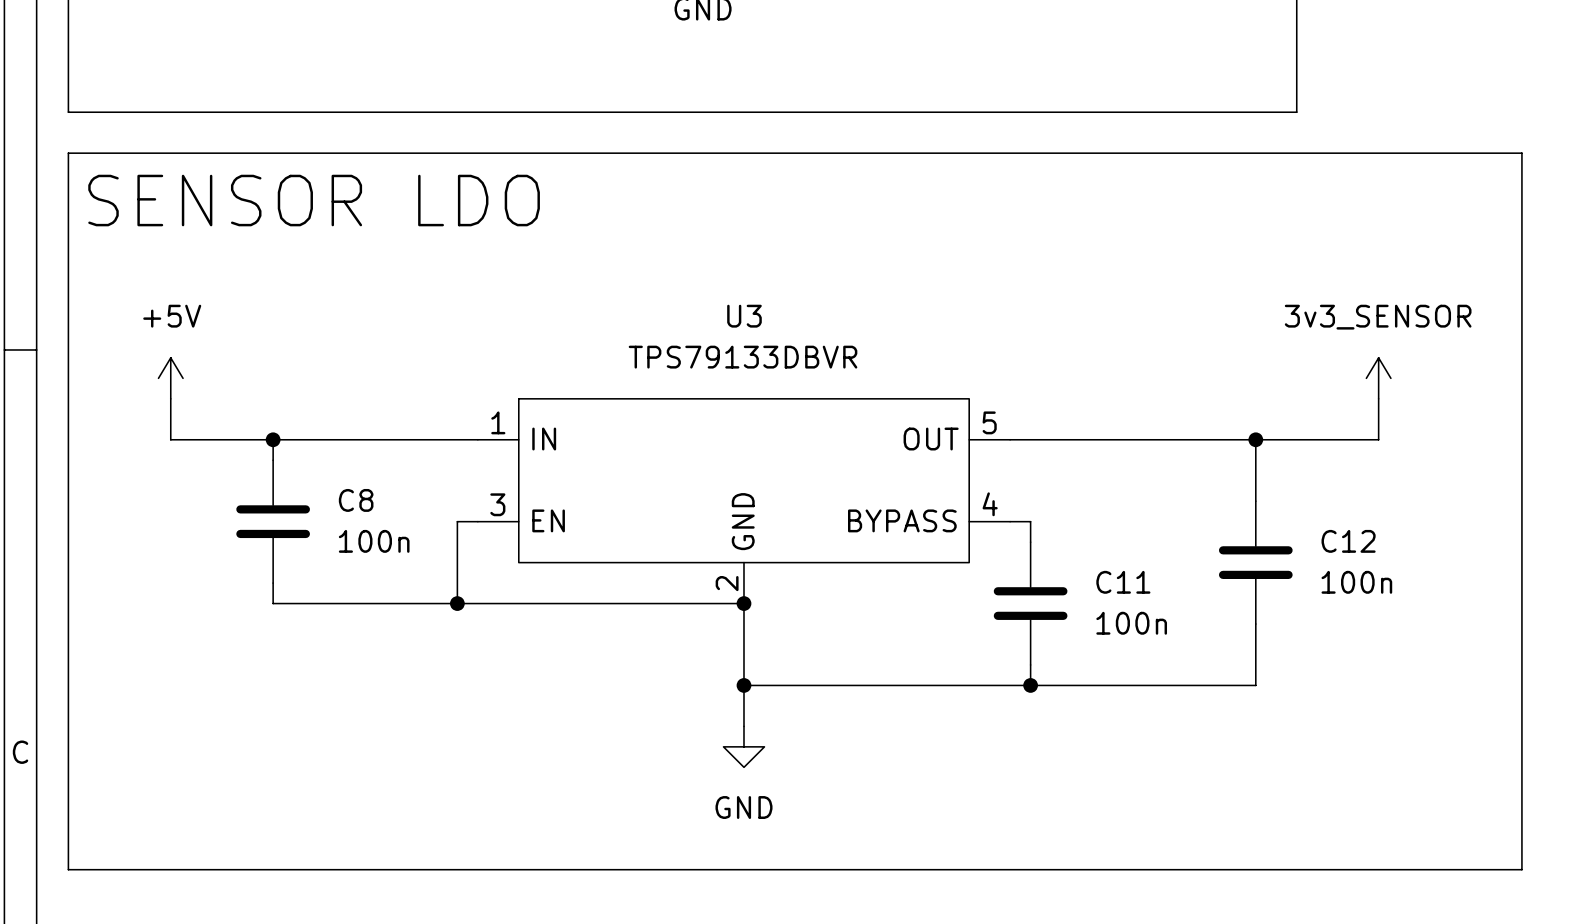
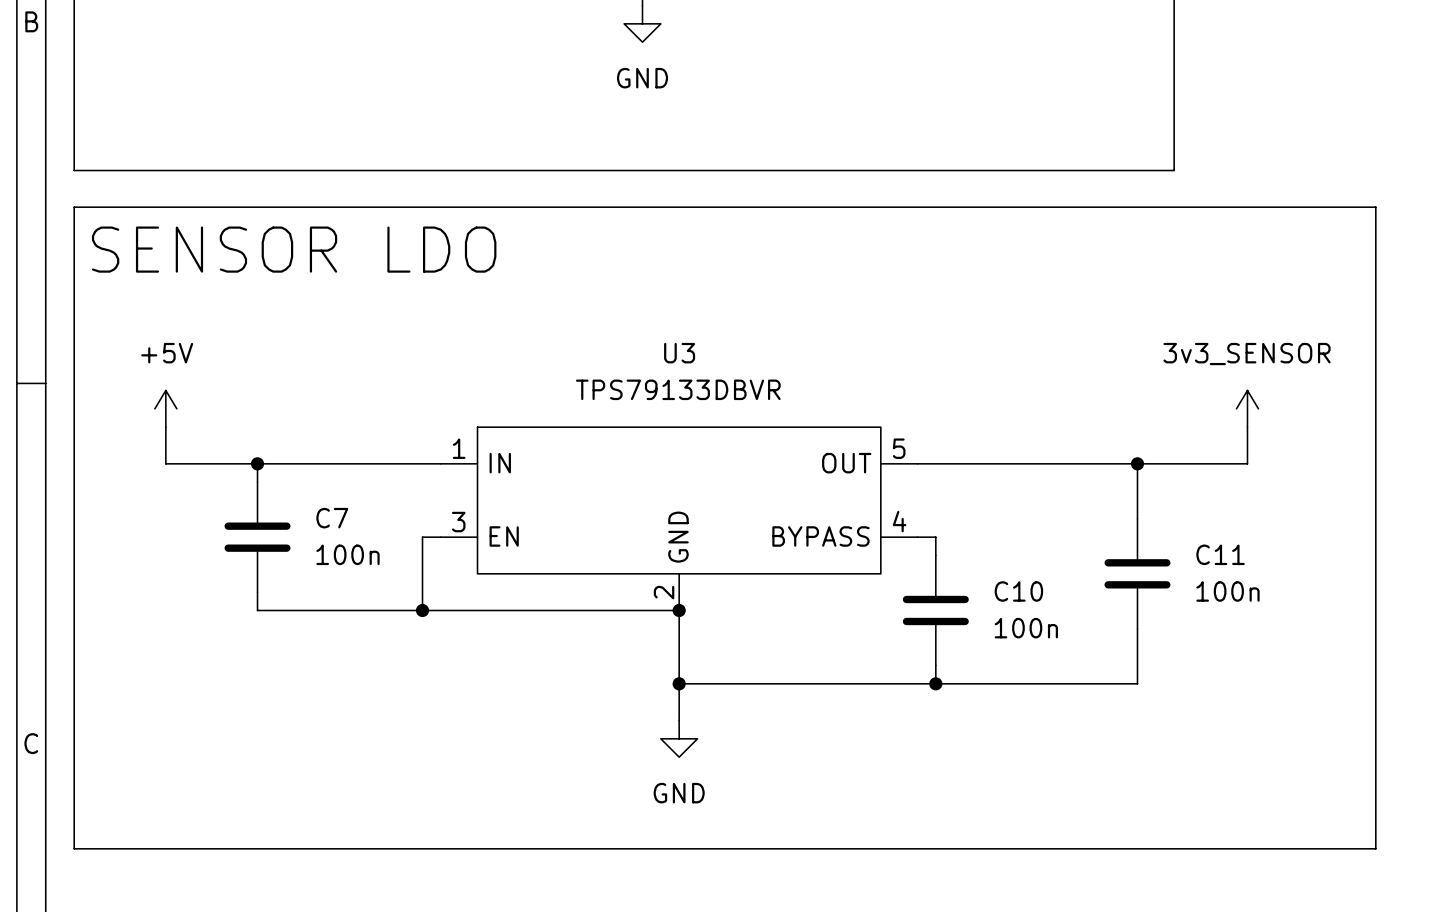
C8 name: C8 (356, 500) -> C7 (332, 518)
C12 name: C12 (1348, 541) -> C11 (1220, 554)
C11 name: C11 (1123, 582) -> C10 (1018, 591)

